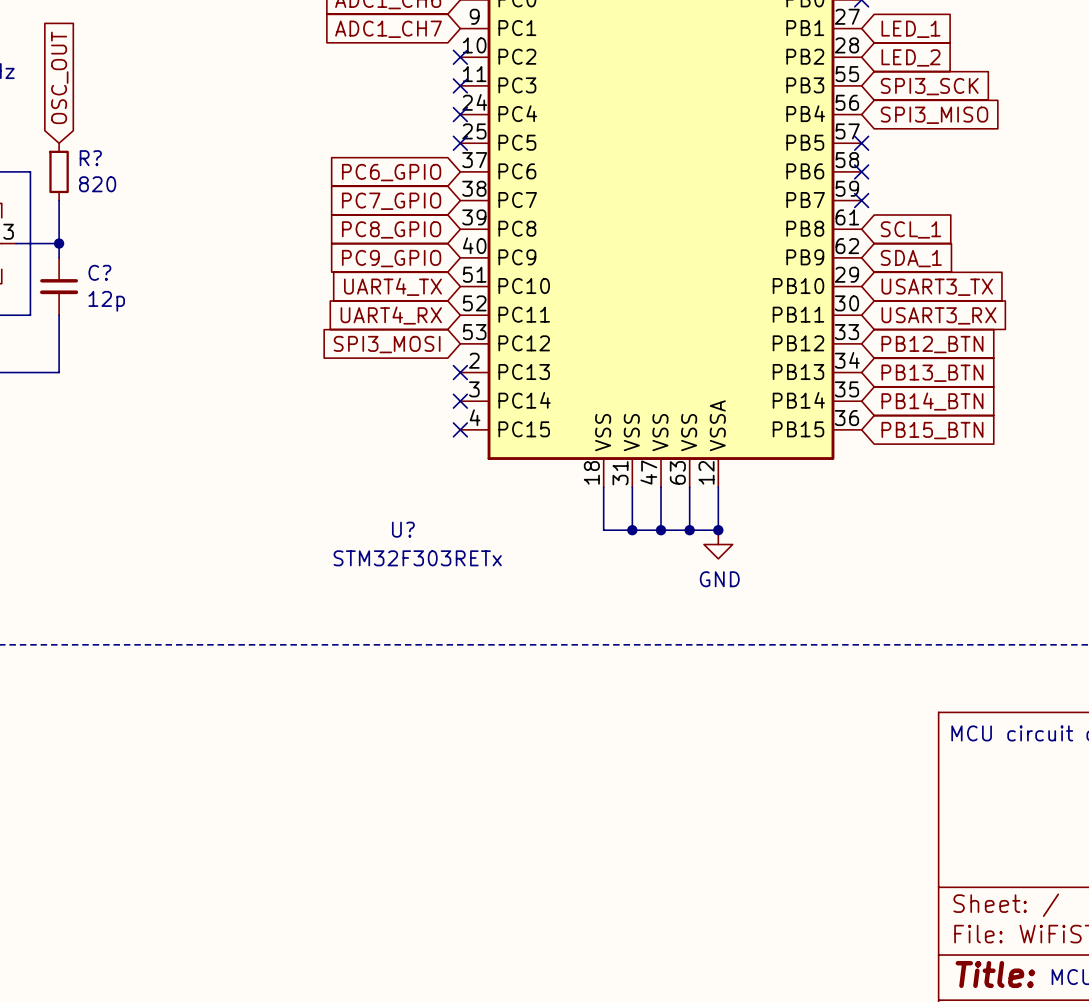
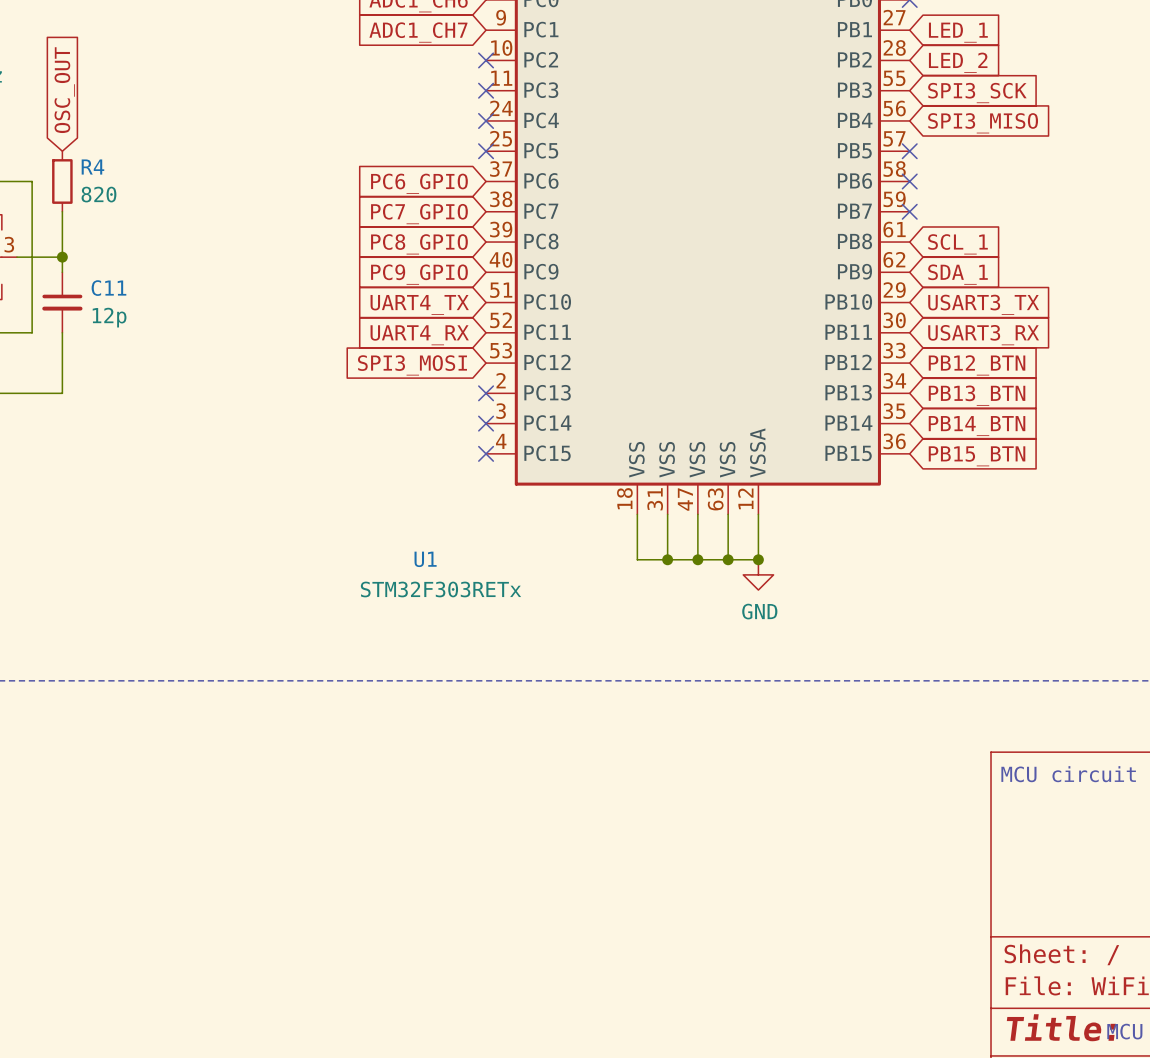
R? name: R? (90, 158) -> R4 (92, 167)
C? name: C? (99, 272) -> C11 (108, 288)
U? name: U? (403, 529) -> U1 (425, 559)

